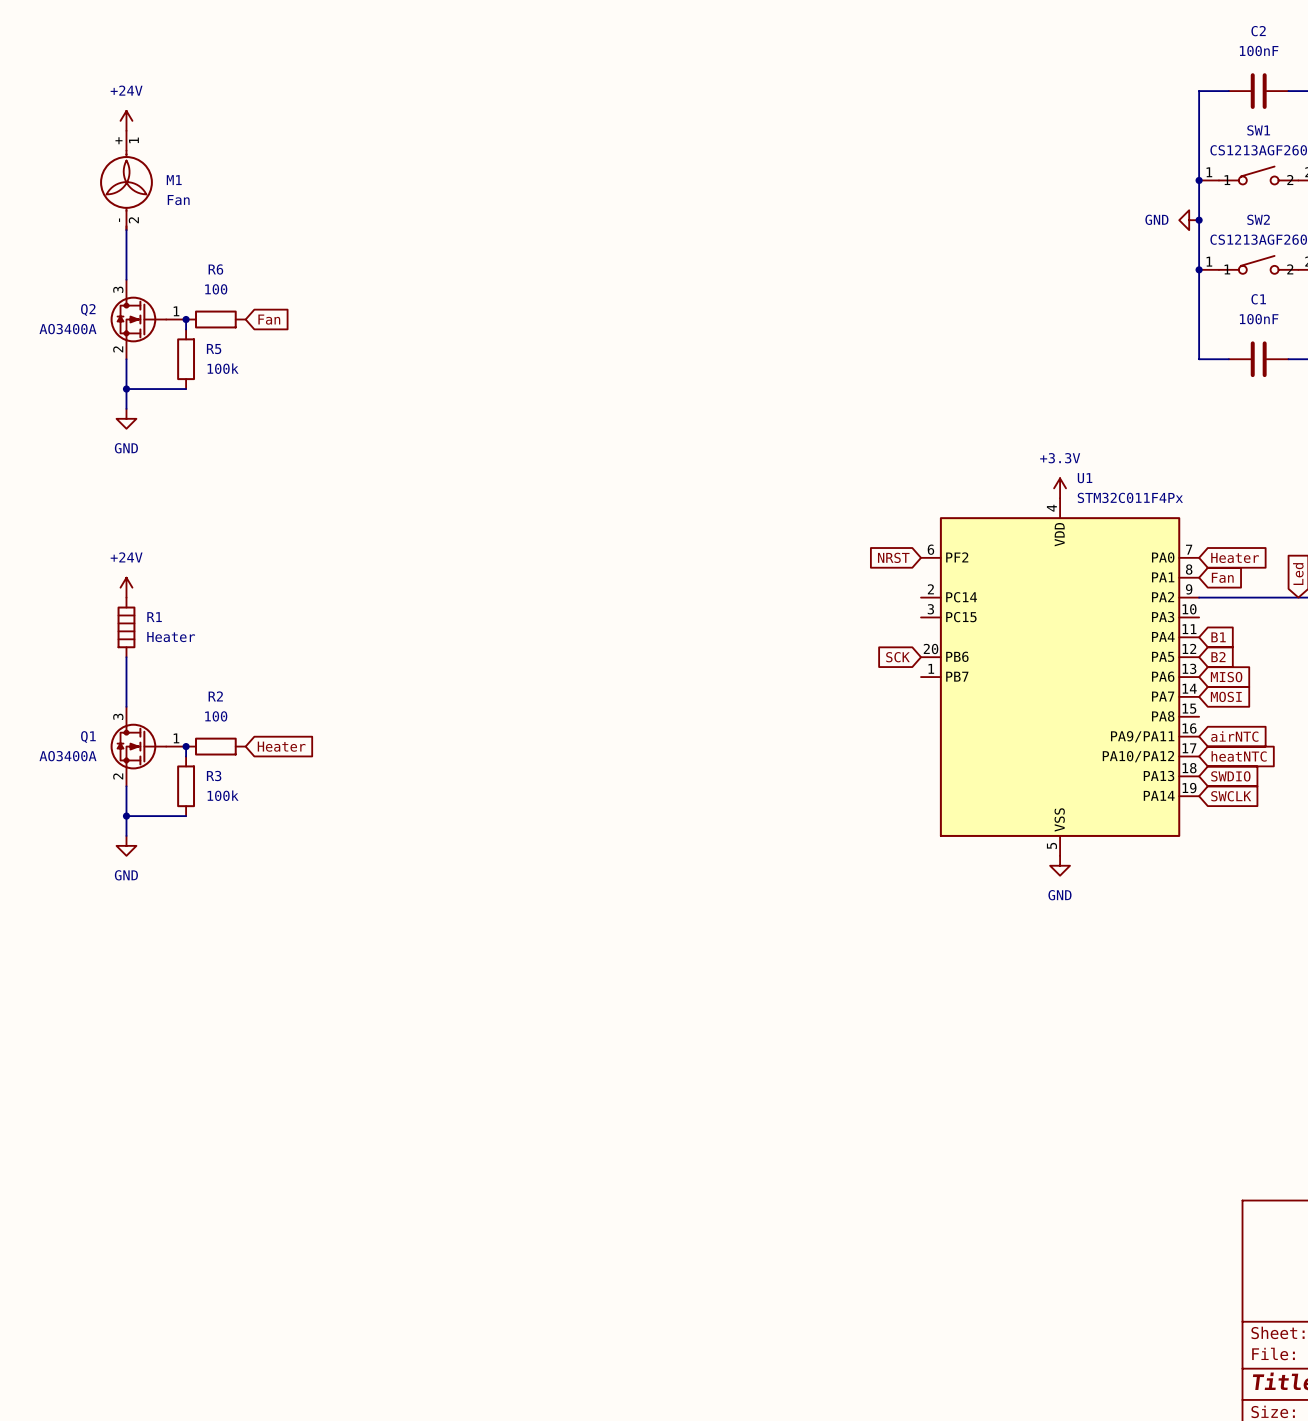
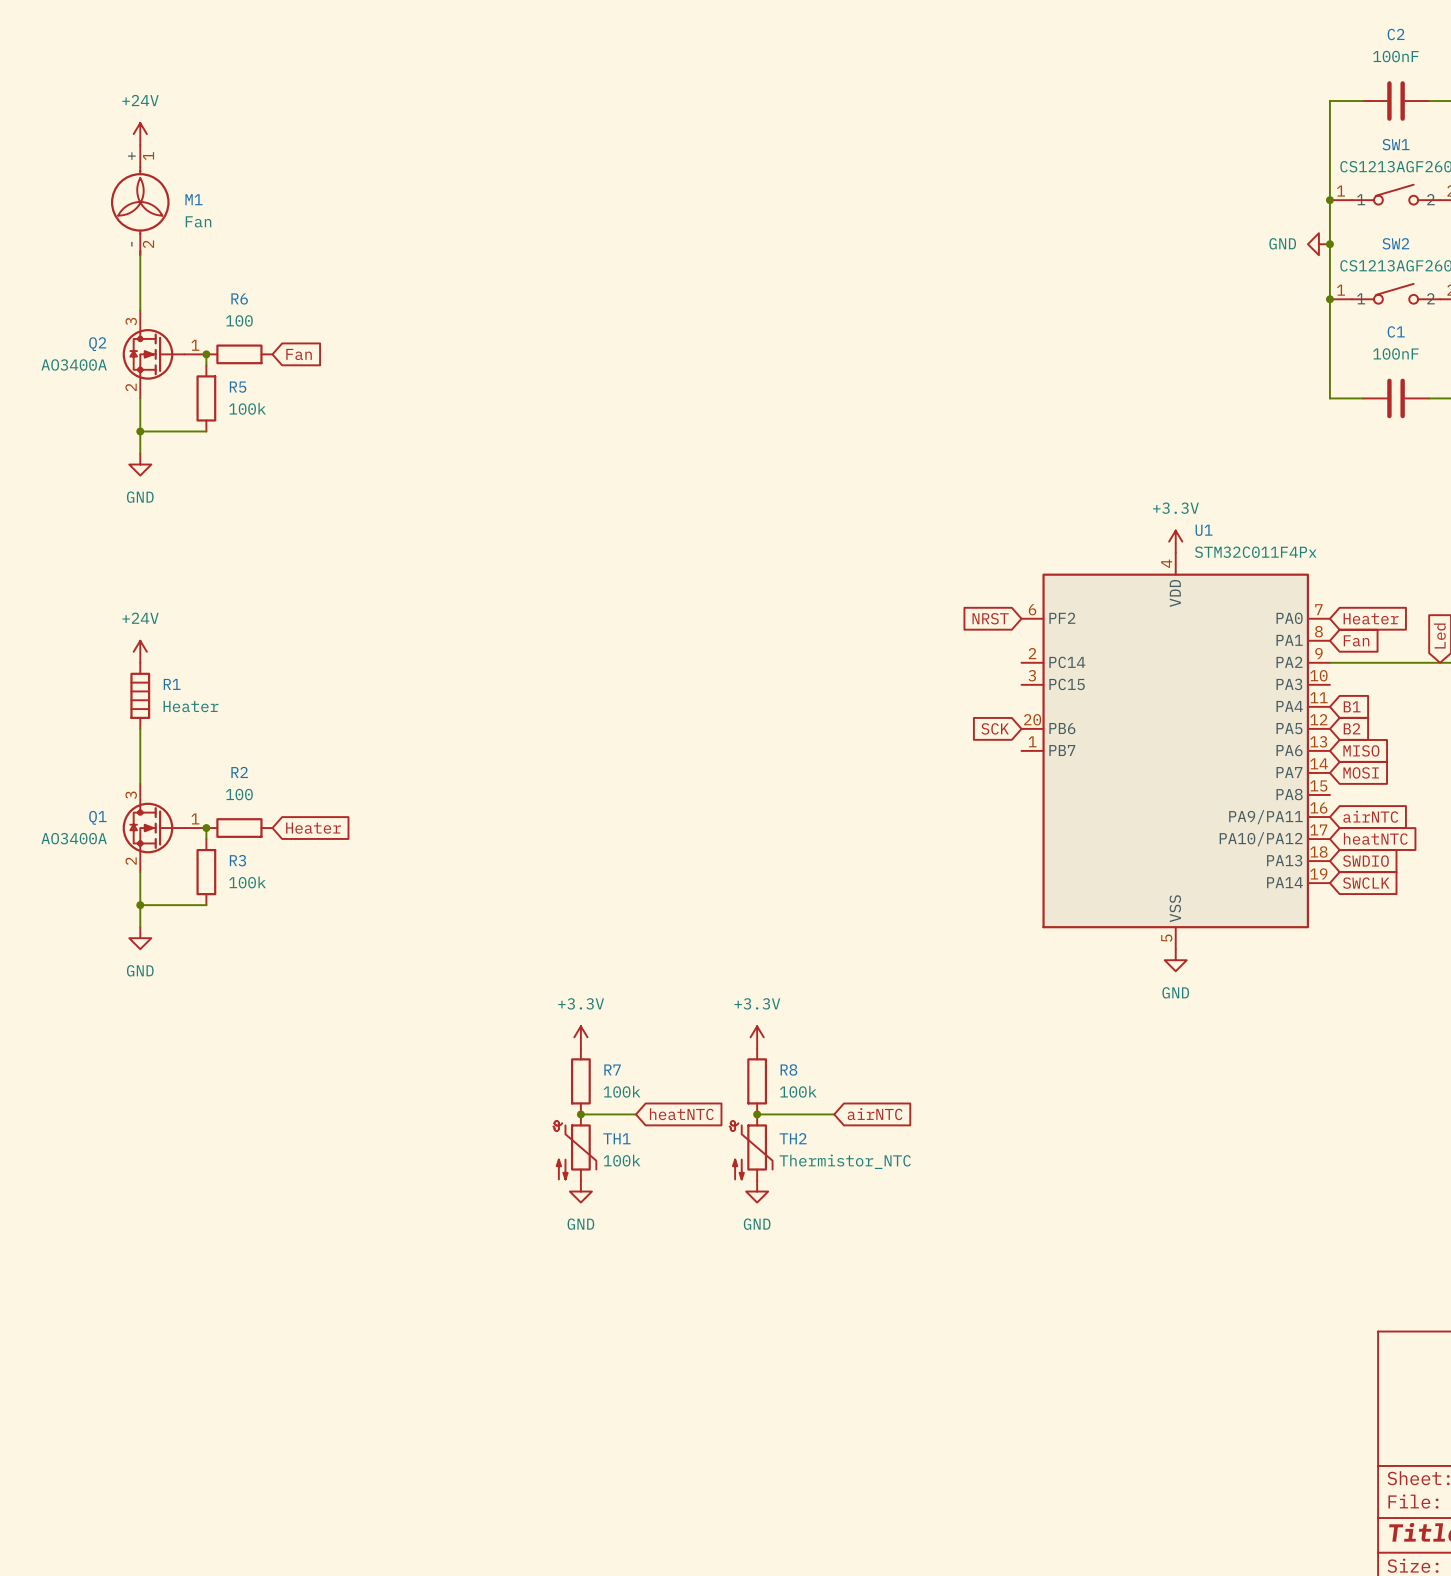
power symbol: none -> +3.3V (580, 1037)
power symbol: none -> +3.3V (757, 1037)
R7: none -> 100k (580, 1081)
R8: none -> 100k (757, 1081)
wire: none -> (580, 1114) (635, 1114)
junction: none -> (580, 1114)
global label: none -> heatNTC (681, 1114)
wire: none -> (757, 1114) (834, 1114)
junction: none -> (757, 1114)
global label: none -> airNTC (875, 1114)
TH1: none -> 100k (574, 1147)
TH2: none -> Thermistor_NTC (751, 1147)
power symbol: none -> GND (580, 1191)
power symbol: none -> GND (757, 1191)

